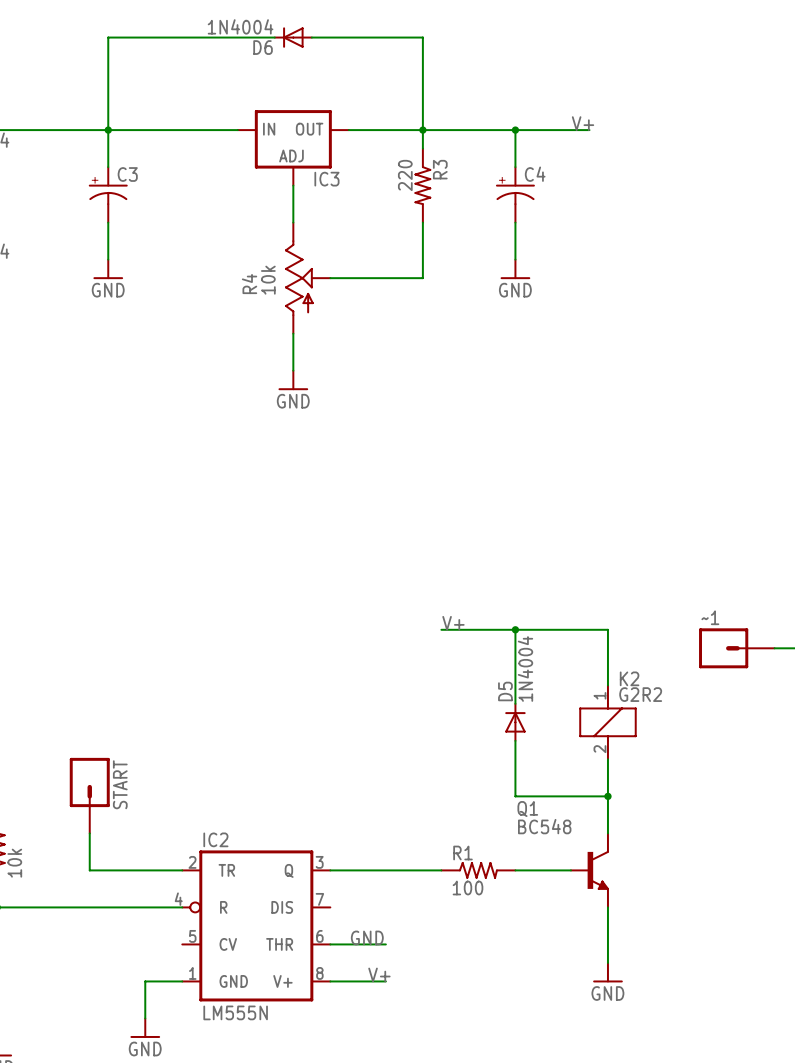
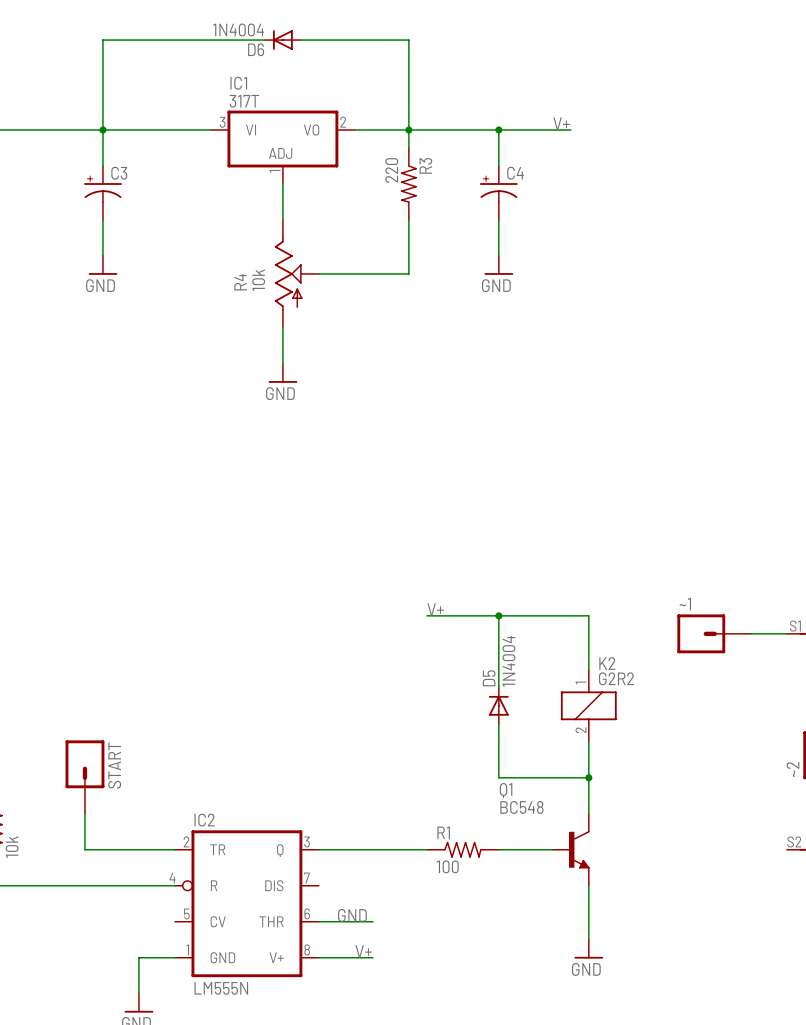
IC3: (293, 147) -> none
IC1: none -> 317T (282, 147)

